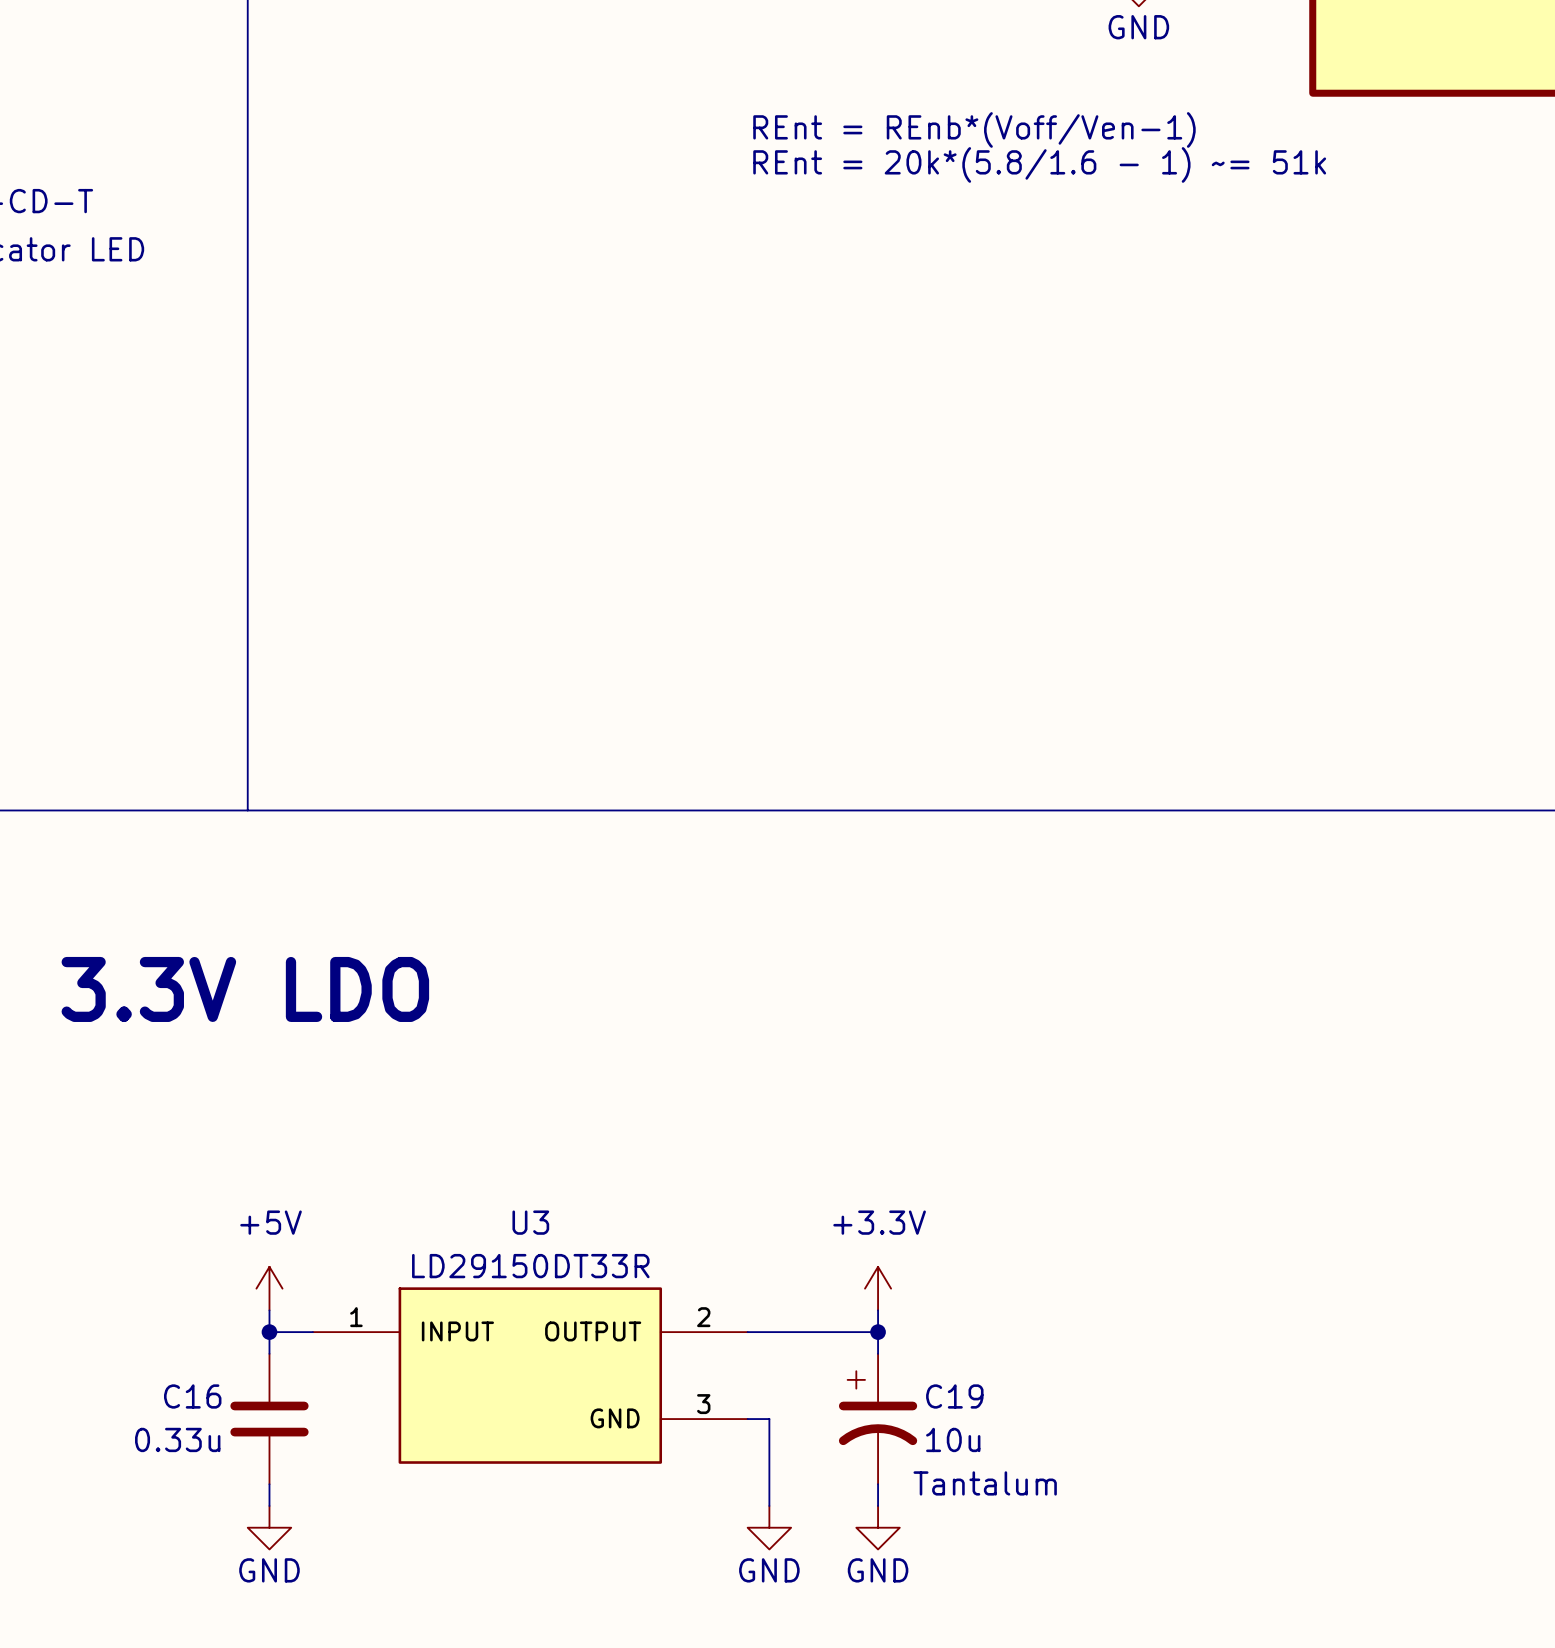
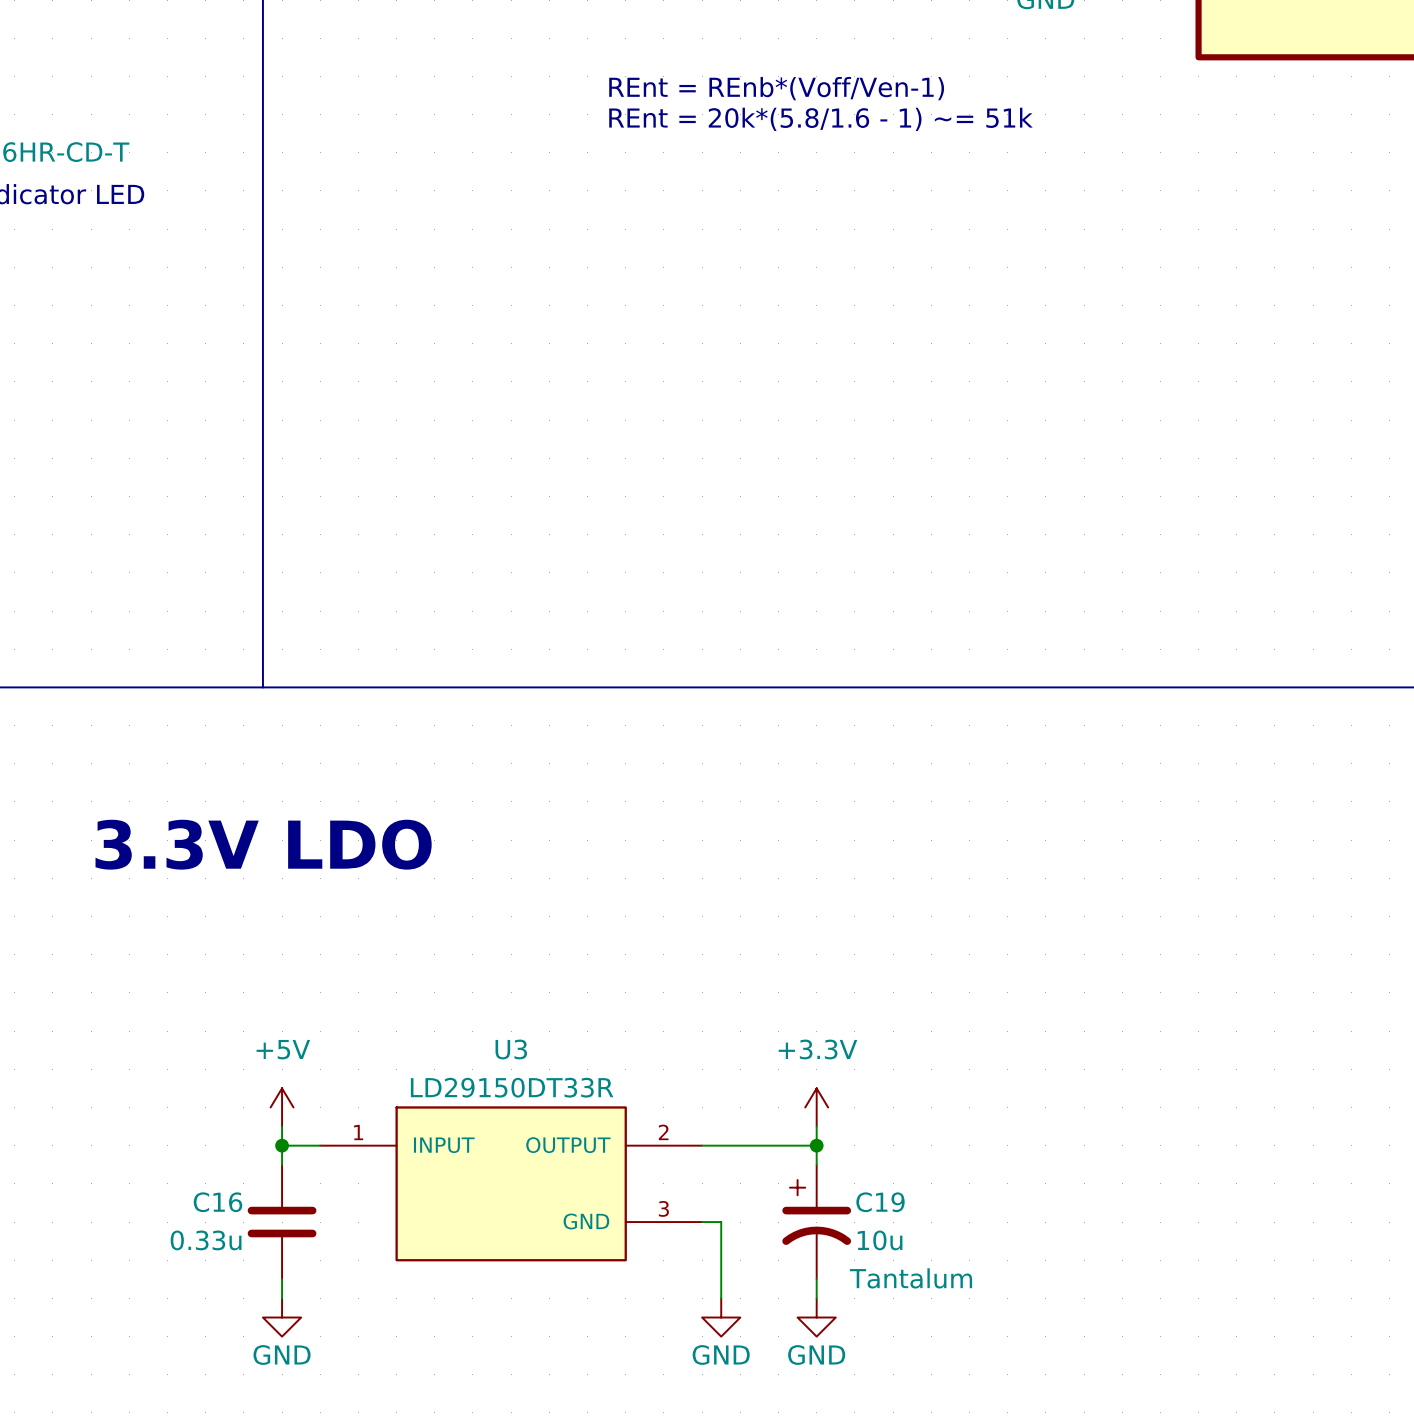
text position: REnt = REnb*(Voff/Ven-1) (974, 129) -> REnt = REnb*(Voff/Ven-1) (776, 88)
text position: REnt = 20k*(5.8/1.6 - 1) ~= 51k (1039, 164) -> REnt = 20k*(5.8/1.6 - 1) ~= 51k (820, 119)

